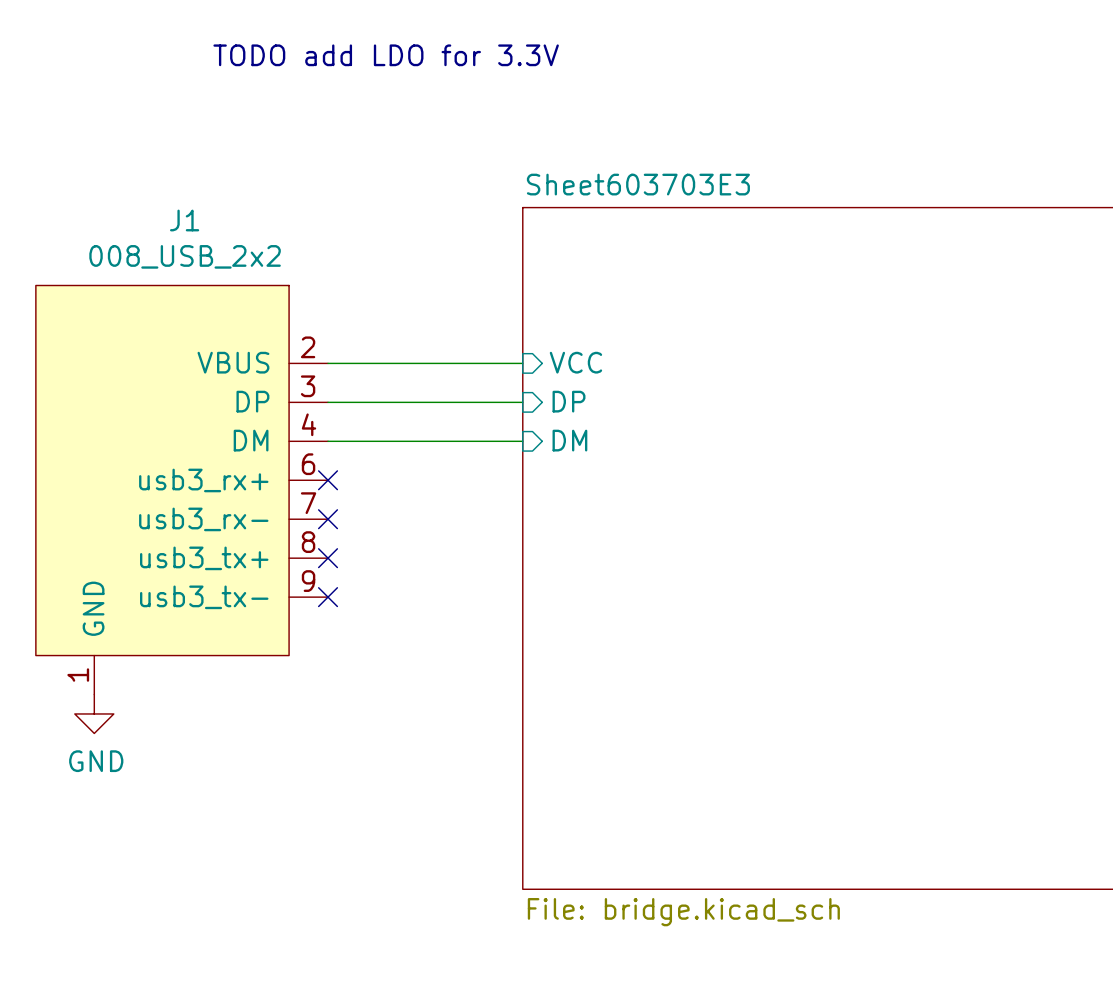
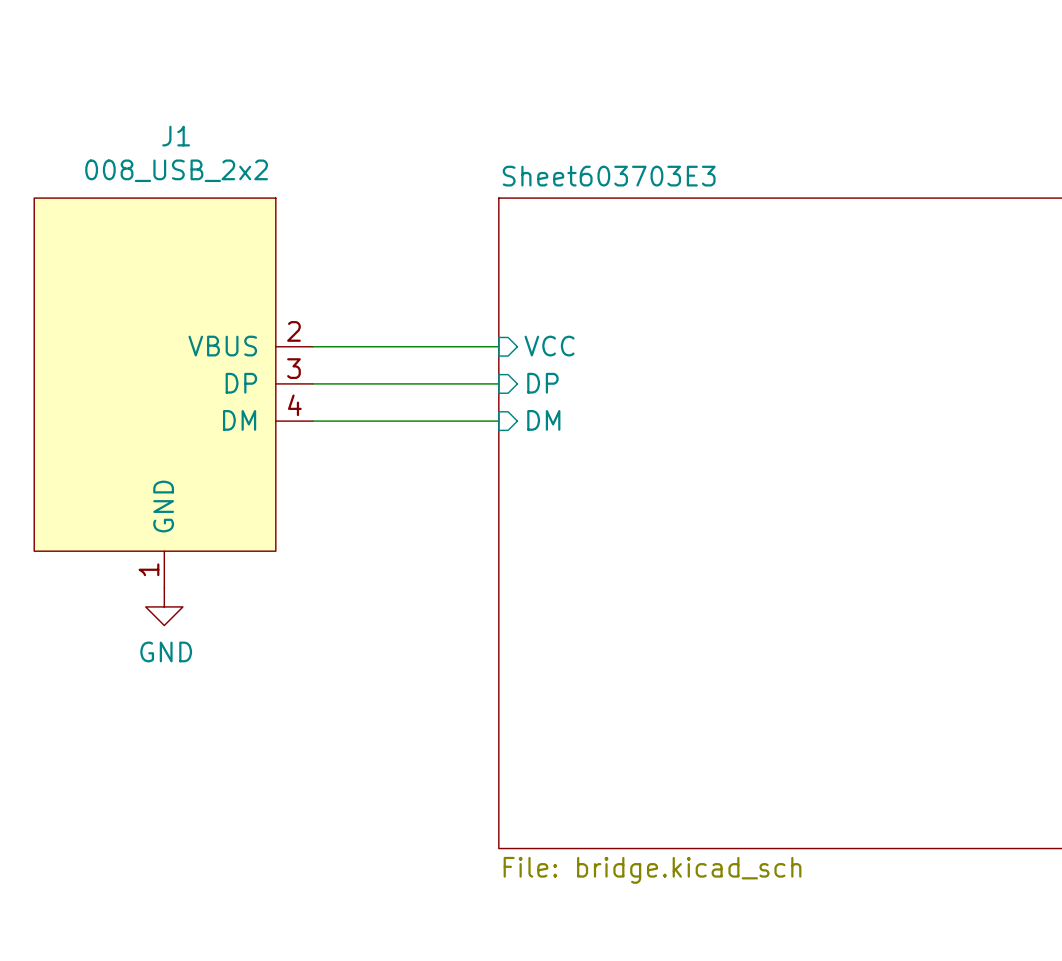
text: TODO add LDO for 3.3V (386, 55) -> none
J1 symbol: [35, 285, 329, 695] -> [34, 198, 313, 589]
no-connect mark: (328, 480) -> none
no-connect mark: (328, 519) -> none
no-connect mark: (328, 558) -> none
no-connect mark: (328, 597) -> none
power symbol position: GND (94, 713) -> GND (164, 606)

